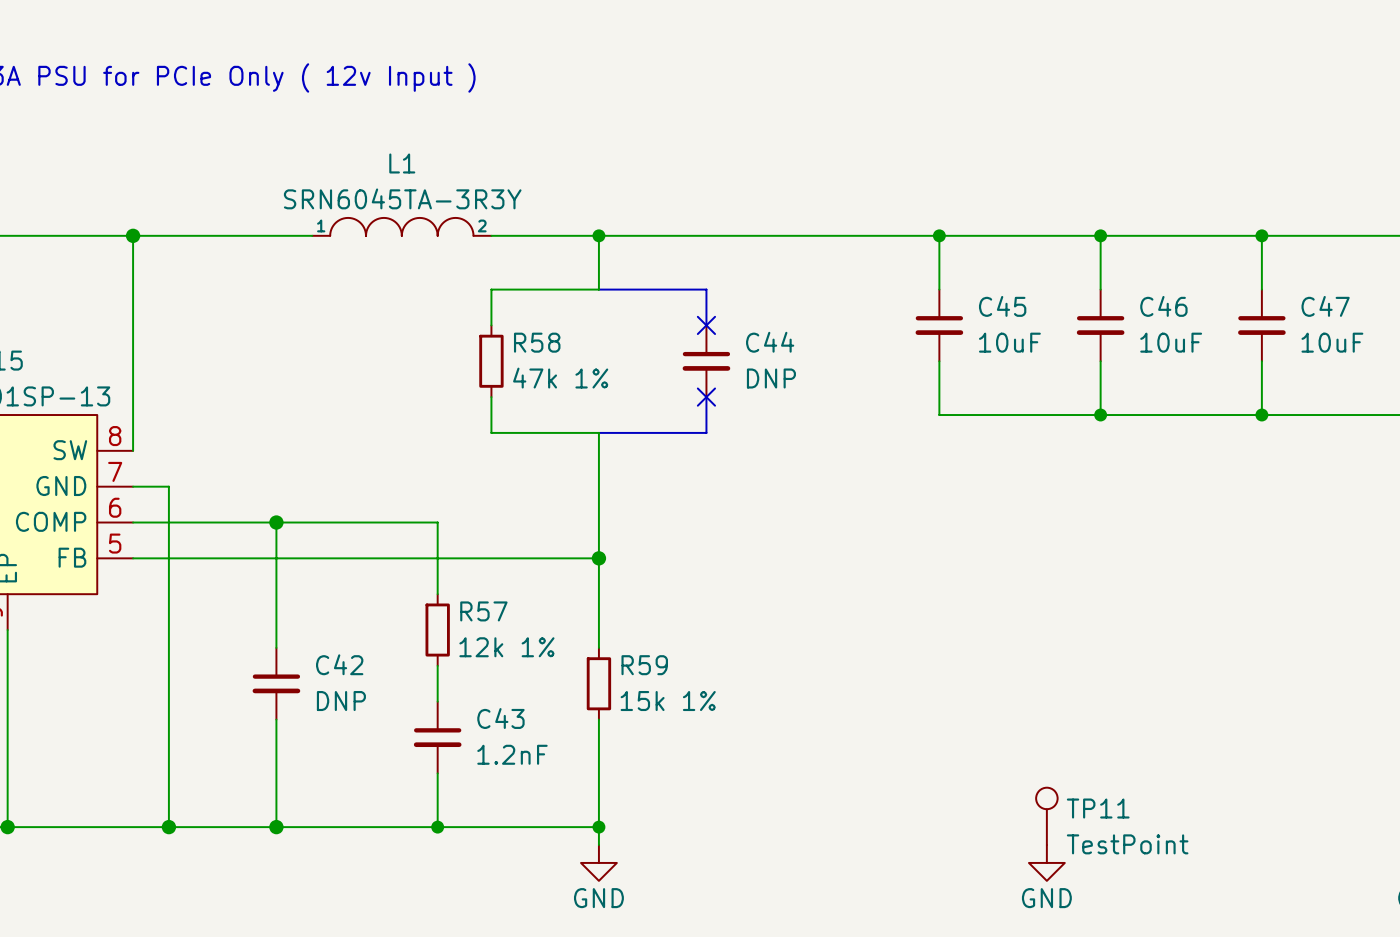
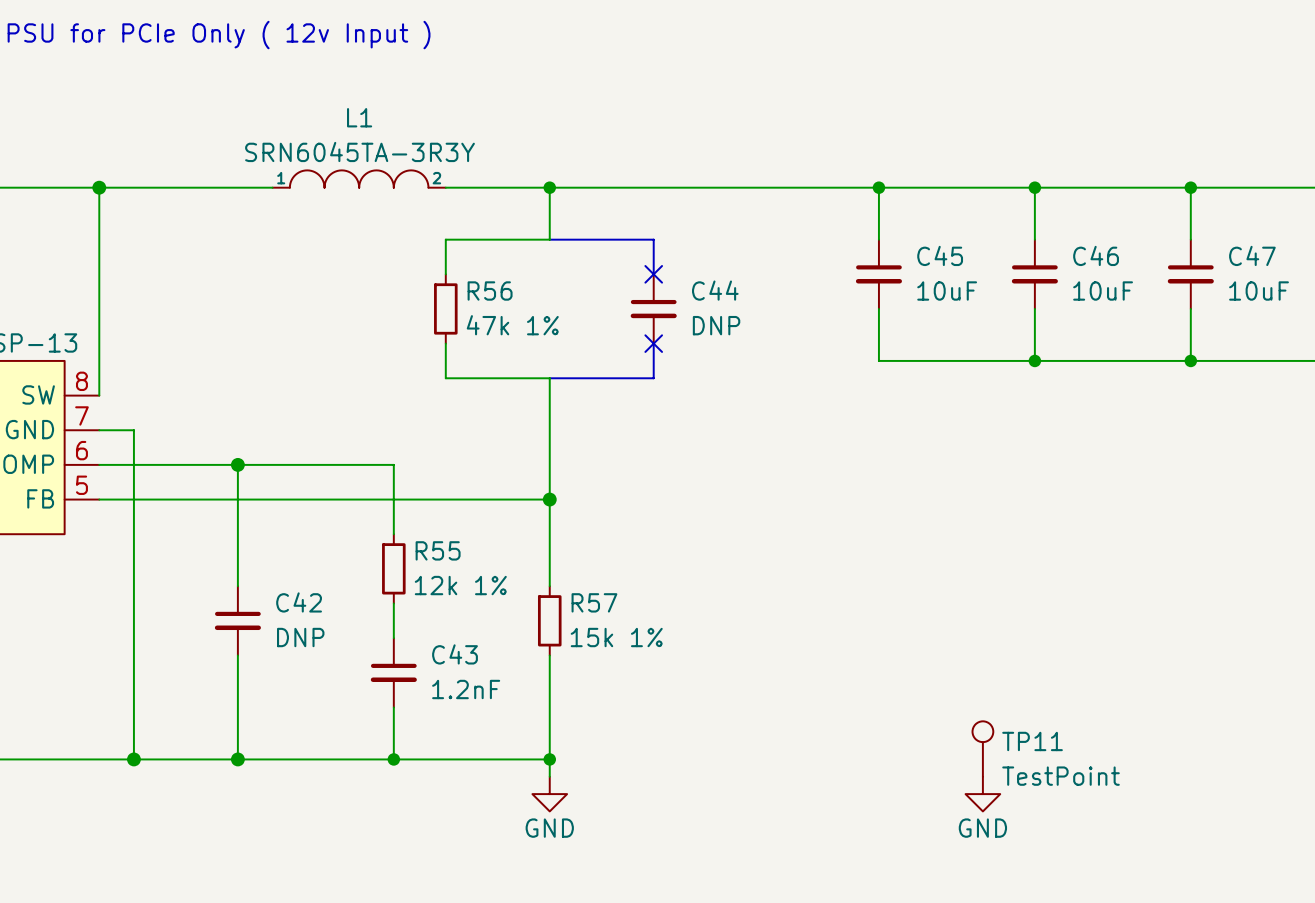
R58 name: R58 (537, 342) -> R56 (490, 291)
R57 name: R57 (483, 611) -> R55 (438, 550)
R59 name: R59 (644, 665) -> R57 (594, 602)

